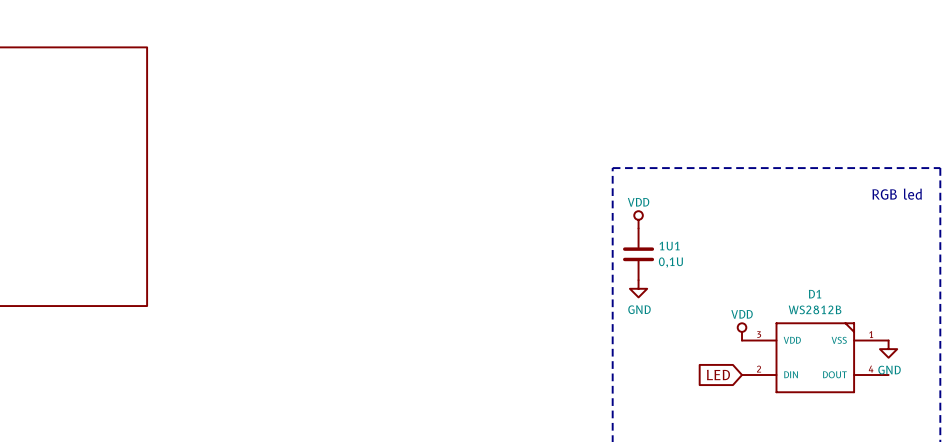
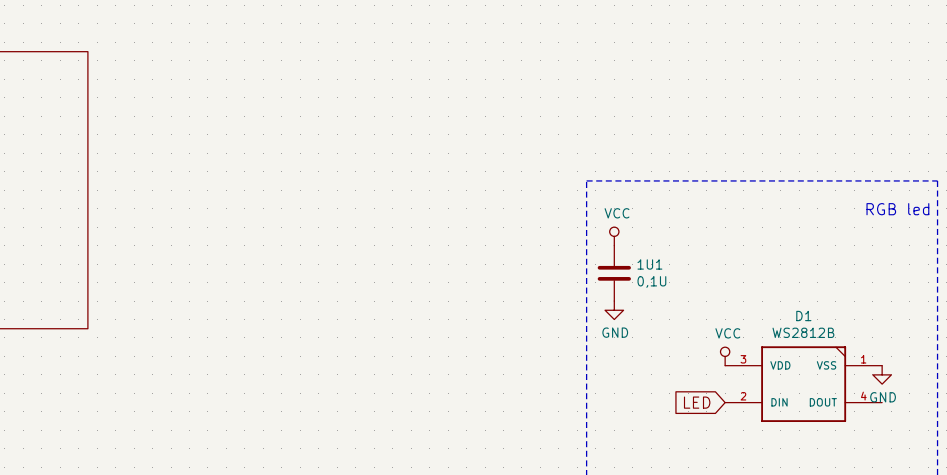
power symbol: VDD (638, 219) -> VCC (614, 236)
power symbol: VDD (742, 331) -> VCC (725, 356)

